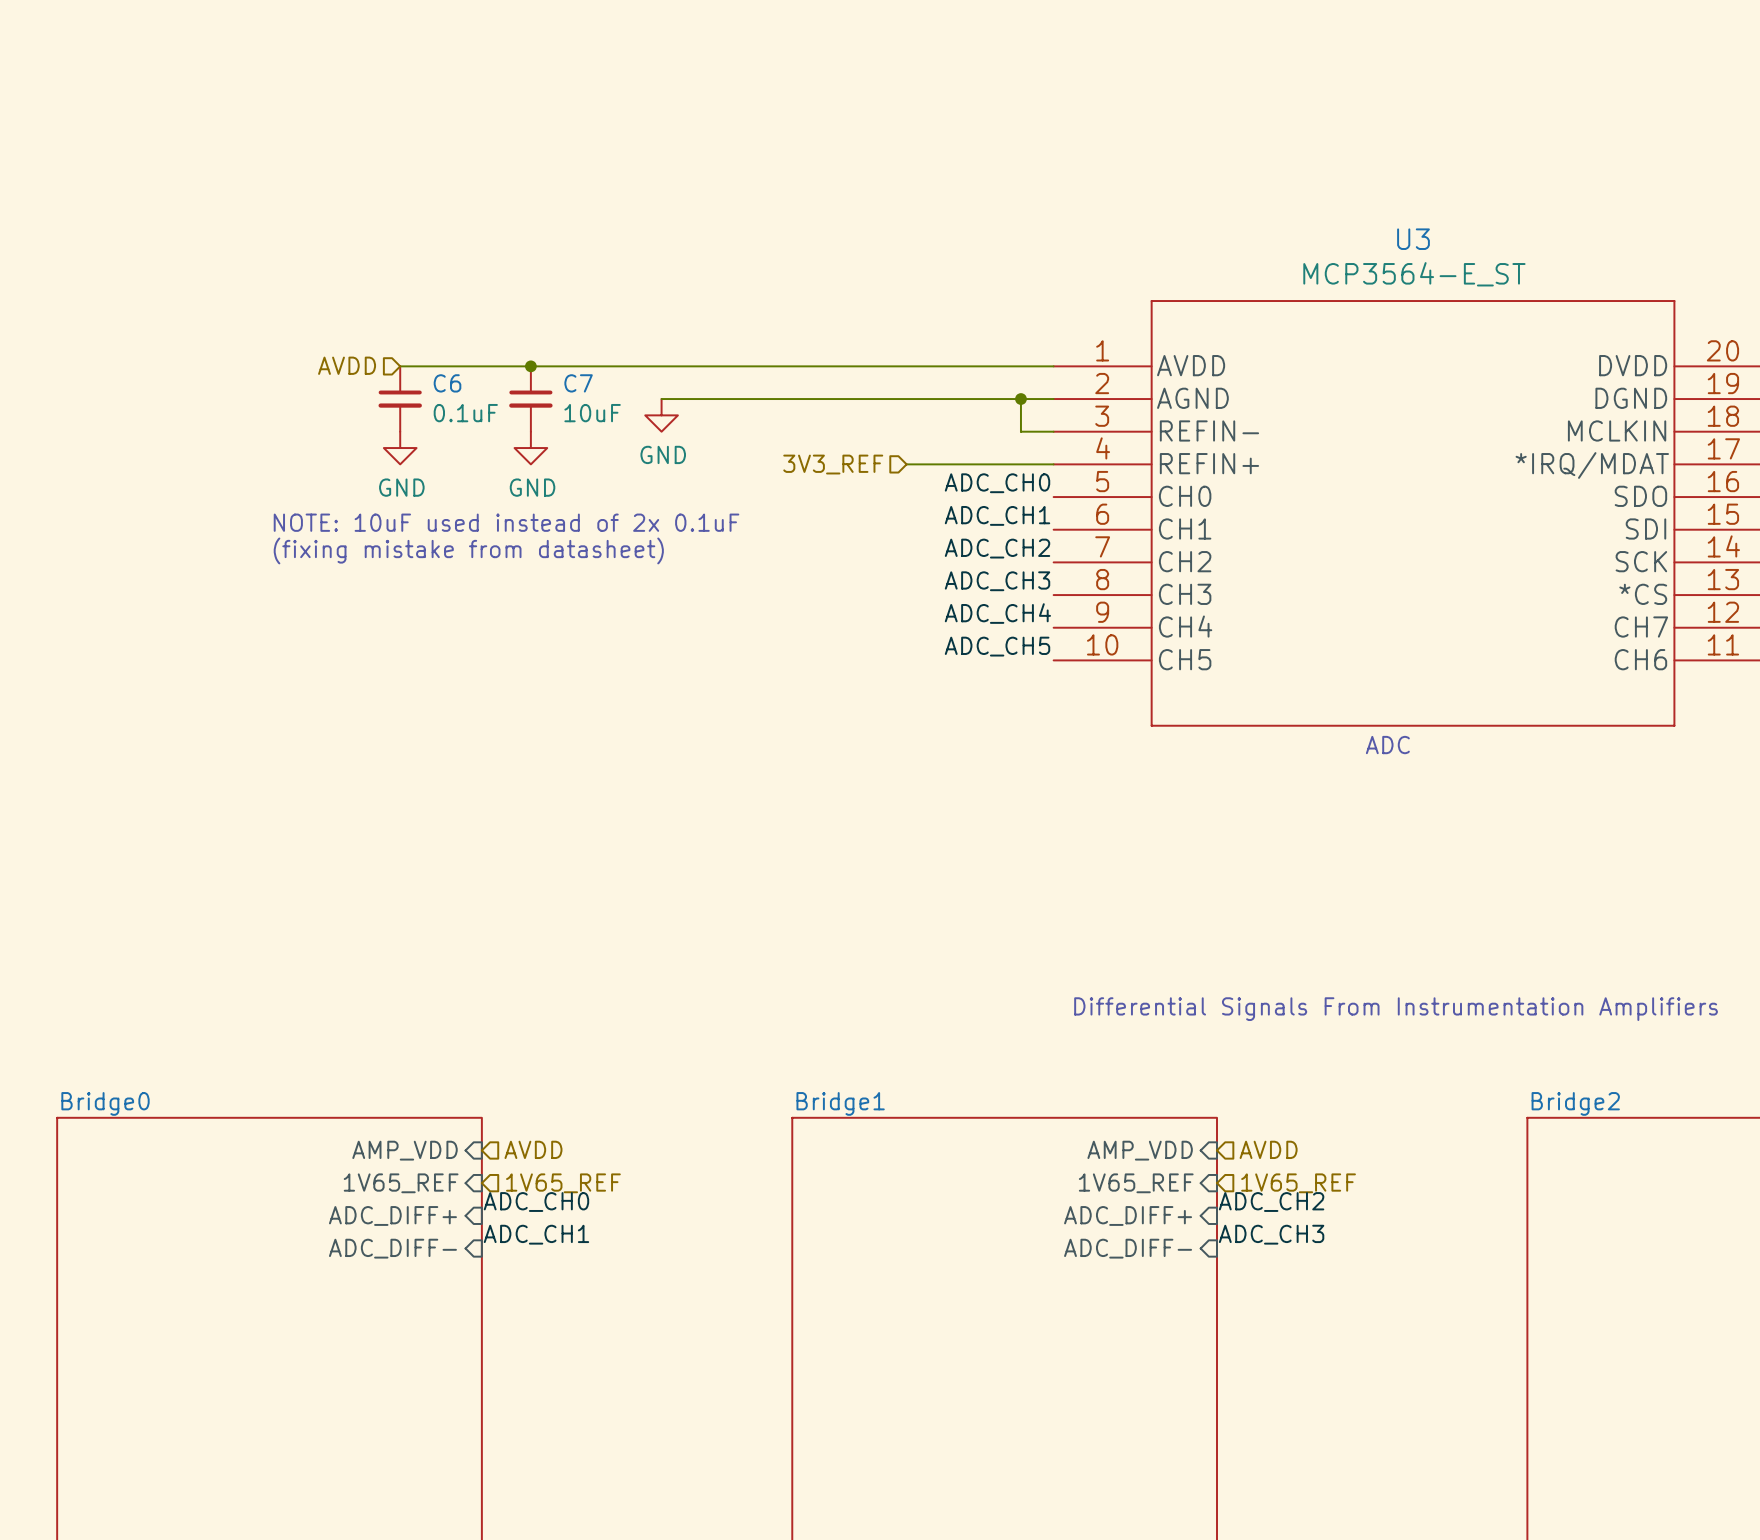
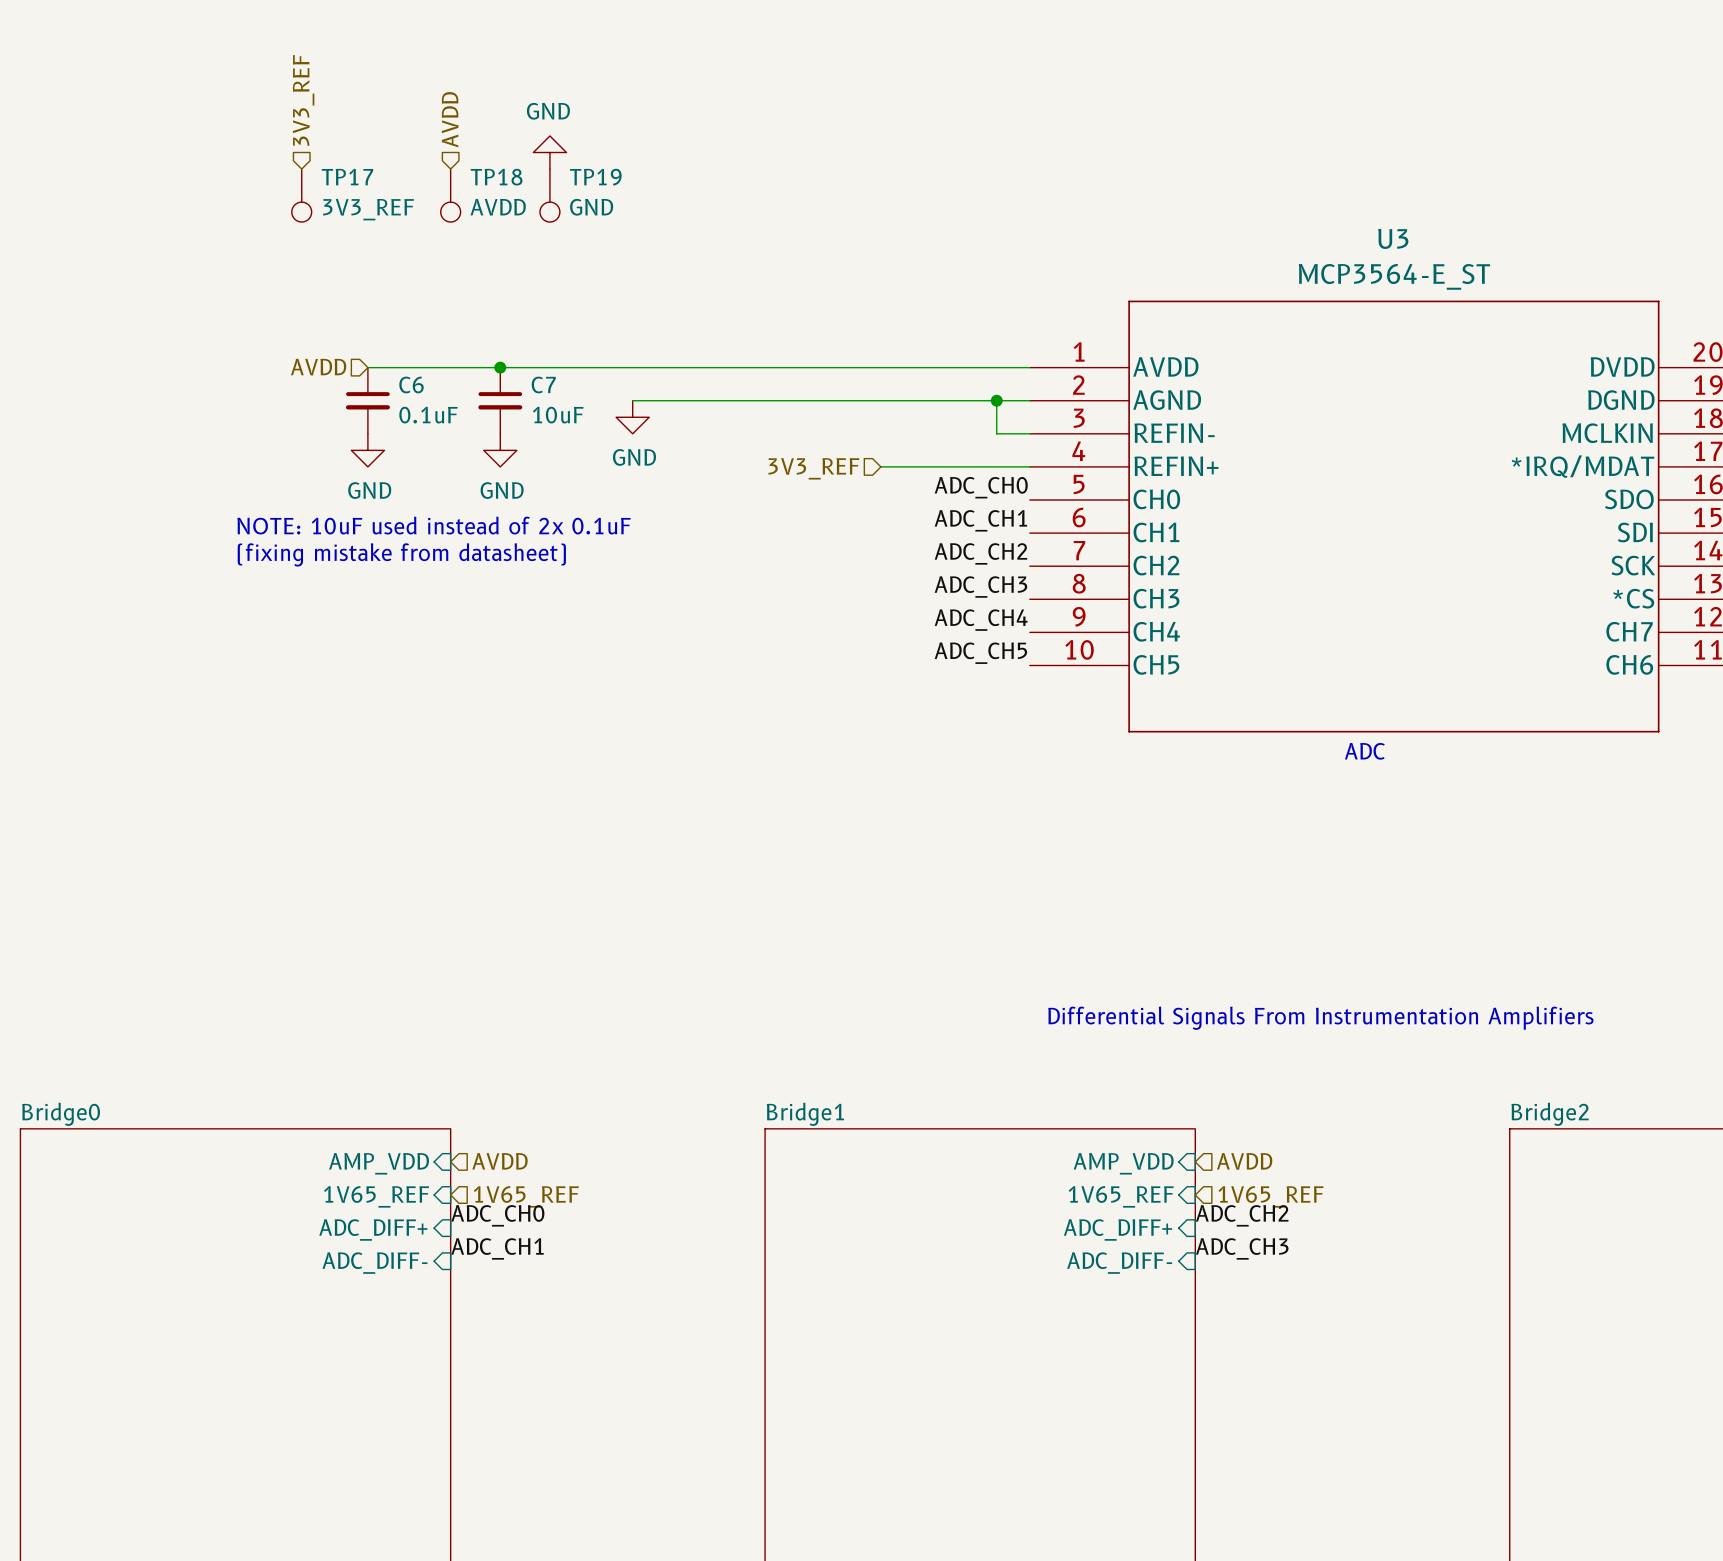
hierarchical label: none -> 3V3_REF (303, 100)
hierarchical label: none -> AVDD (450, 119)
power symbol: none -> GND (549, 152)
TP17: none -> 3V3_REF (301, 195)
TP18: none -> AVDD (450, 195)
TP19: none -> GND (549, 195)

